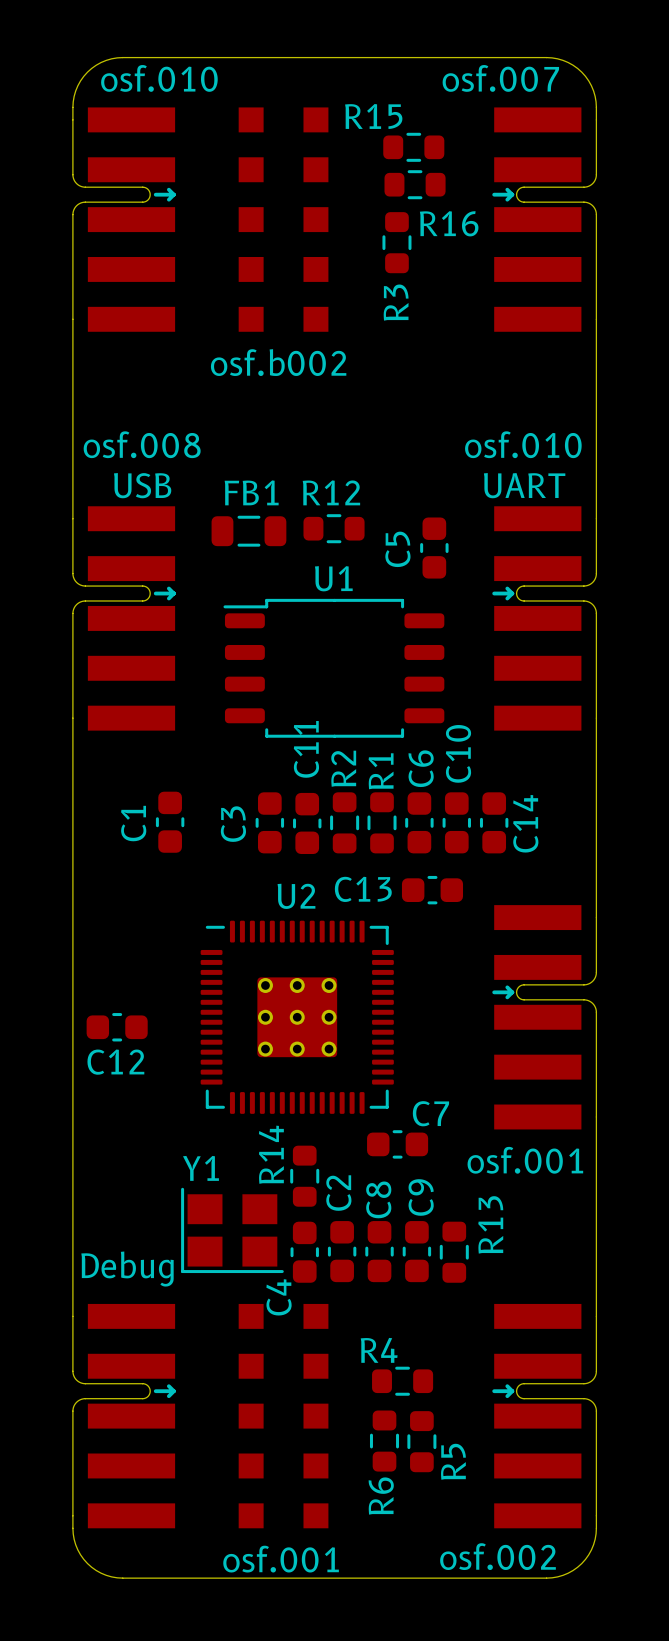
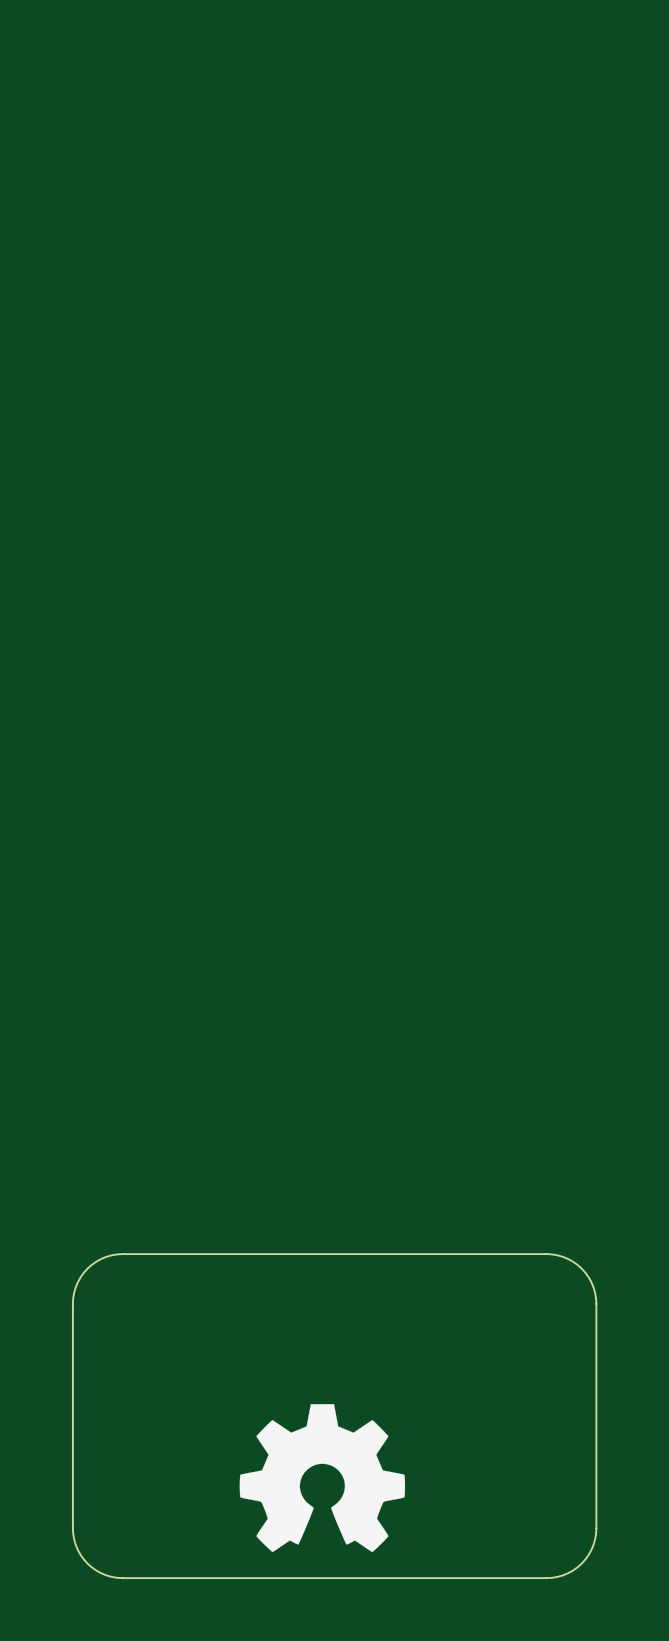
text: osf.010 (159, 78) -> none
text: osf.007 (500, 78) -> none
board edge: (72, 119) (74, 96) (83, 76) (101, 62) (122, 57) (552, 57) (568, 62) (585, 76) (595, 96) (596, 119) -> none
R15: (413, 147) -> none
R16: (415, 184) -> none
part: (124, 219) -> none
part: (283, 219) -> none
part: (544, 219) -> none
R3: (396, 242) -> none
board edge: (72, 319) (72, 518) -> none
board edge: (596, 319) (596, 518) -> none
text: osf.b002 (278, 362) -> none
text: osf.008 (142, 444) -> none
text: osf.010 (523, 444) -> none
text: USB (142, 485) -> none
text: UART (524, 485) -> none
R12: (334, 528) -> none
FB1: (248, 531) -> none
C5: (434, 548) -> none
part: (124, 618) -> none
part: (544, 618) -> none
U1: (333, 668) -> none
board edge: (72, 718) (72, 1303) -> none
board edge: (596, 718) (596, 917) -> (596, 1316) (596, 1515)
C1: (170, 822) -> none
C3: (269, 822) -> none
R2: (344, 822) -> none
R1: (382, 822) -> none
C6: (419, 822) -> none
C10: (456, 822) -> none
C14: (494, 822) -> none
C11: (307, 823) -> none
C13: (432, 890) -> none
U2: (297, 1017) -> none
part: (544, 1017) -> none
C12: (117, 1027) -> none
board edge: (596, 1116) (596, 1303) -> (72, 1303) (77, 1282) (87, 1268) (101, 1259) (122, 1254) (552, 1254) (568, 1259) (581, 1268) (591, 1282) (596, 1303)
C7: (397, 1144) -> none
text: osf.001 (525, 1160) -> none
R14: (304, 1176) -> none
Y1: (232, 1230) -> none
C2: (342, 1251) -> none
C8: (379, 1251) -> none
C9: (416, 1251) -> none
C4: (304, 1252) -> none
R13: (454, 1252) -> none
text: Debug (127, 1269) -> none
board edge: none -> (72, 1316) (72, 1515)
R4: (402, 1381) -> none
drawing: none -> [239, 1404, 406, 1553]
part: (124, 1416) -> none
part: (283, 1416) -> none
part: (544, 1416) -> none
R6: (384, 1441) -> none
R5: (421, 1441) -> none
text: osf.002 (497, 1556) -> none
text: osf.001 (281, 1559) -> none

